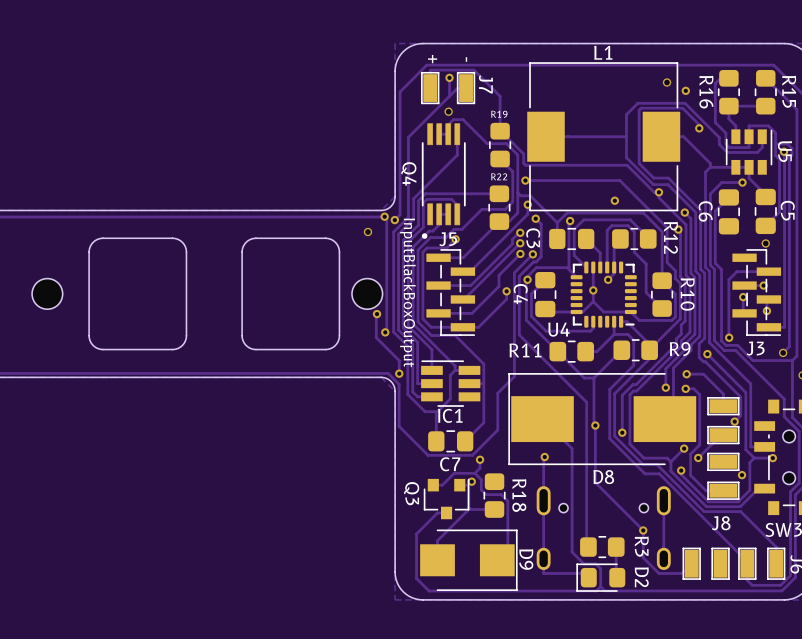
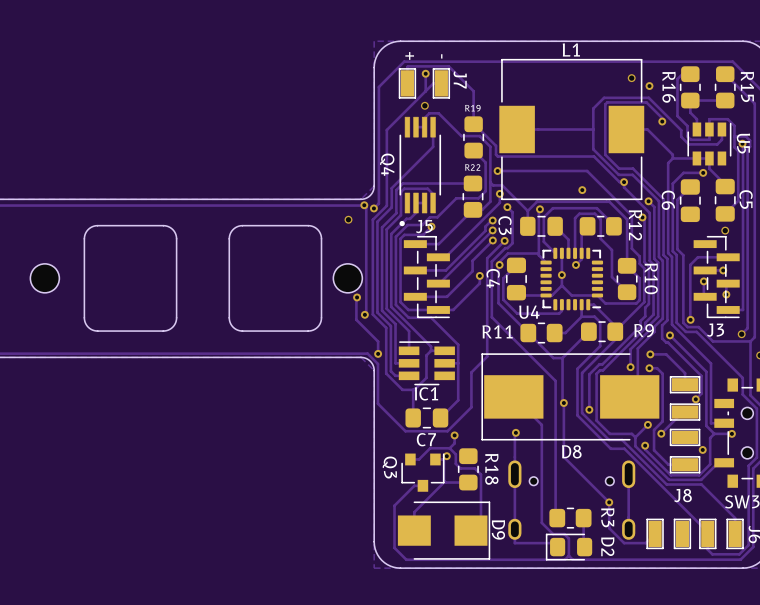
text: InputBlackBoxOutput (407, 292) -> none

